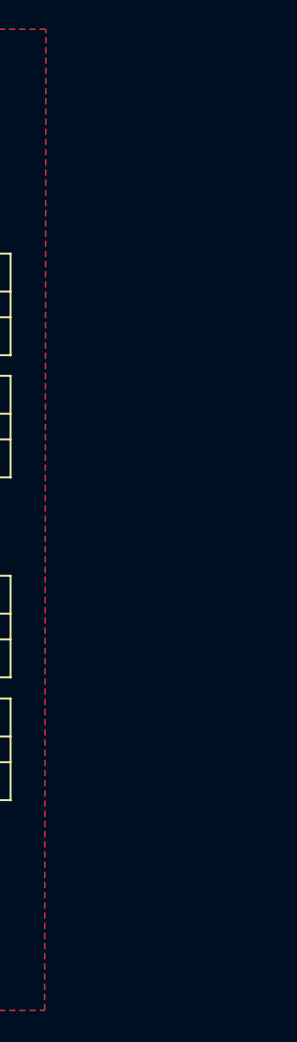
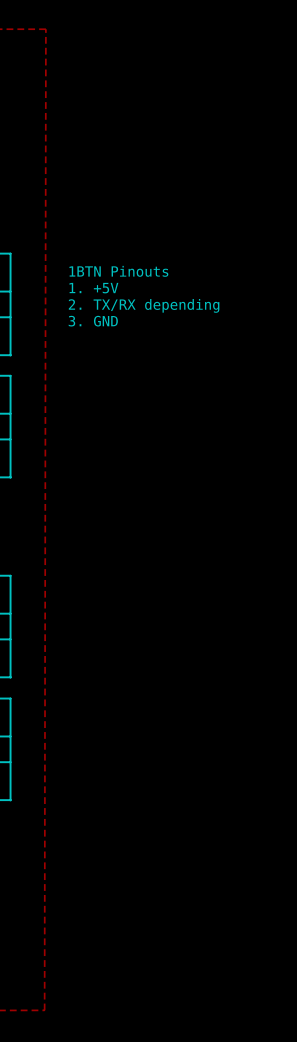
text: none -> 1BTN Pinouts (118, 271)
text: none -> 1. +5V (93, 288)
text: none -> 2. TX/RX depending (144, 305)
text: none -> 3. GND (93, 321)

